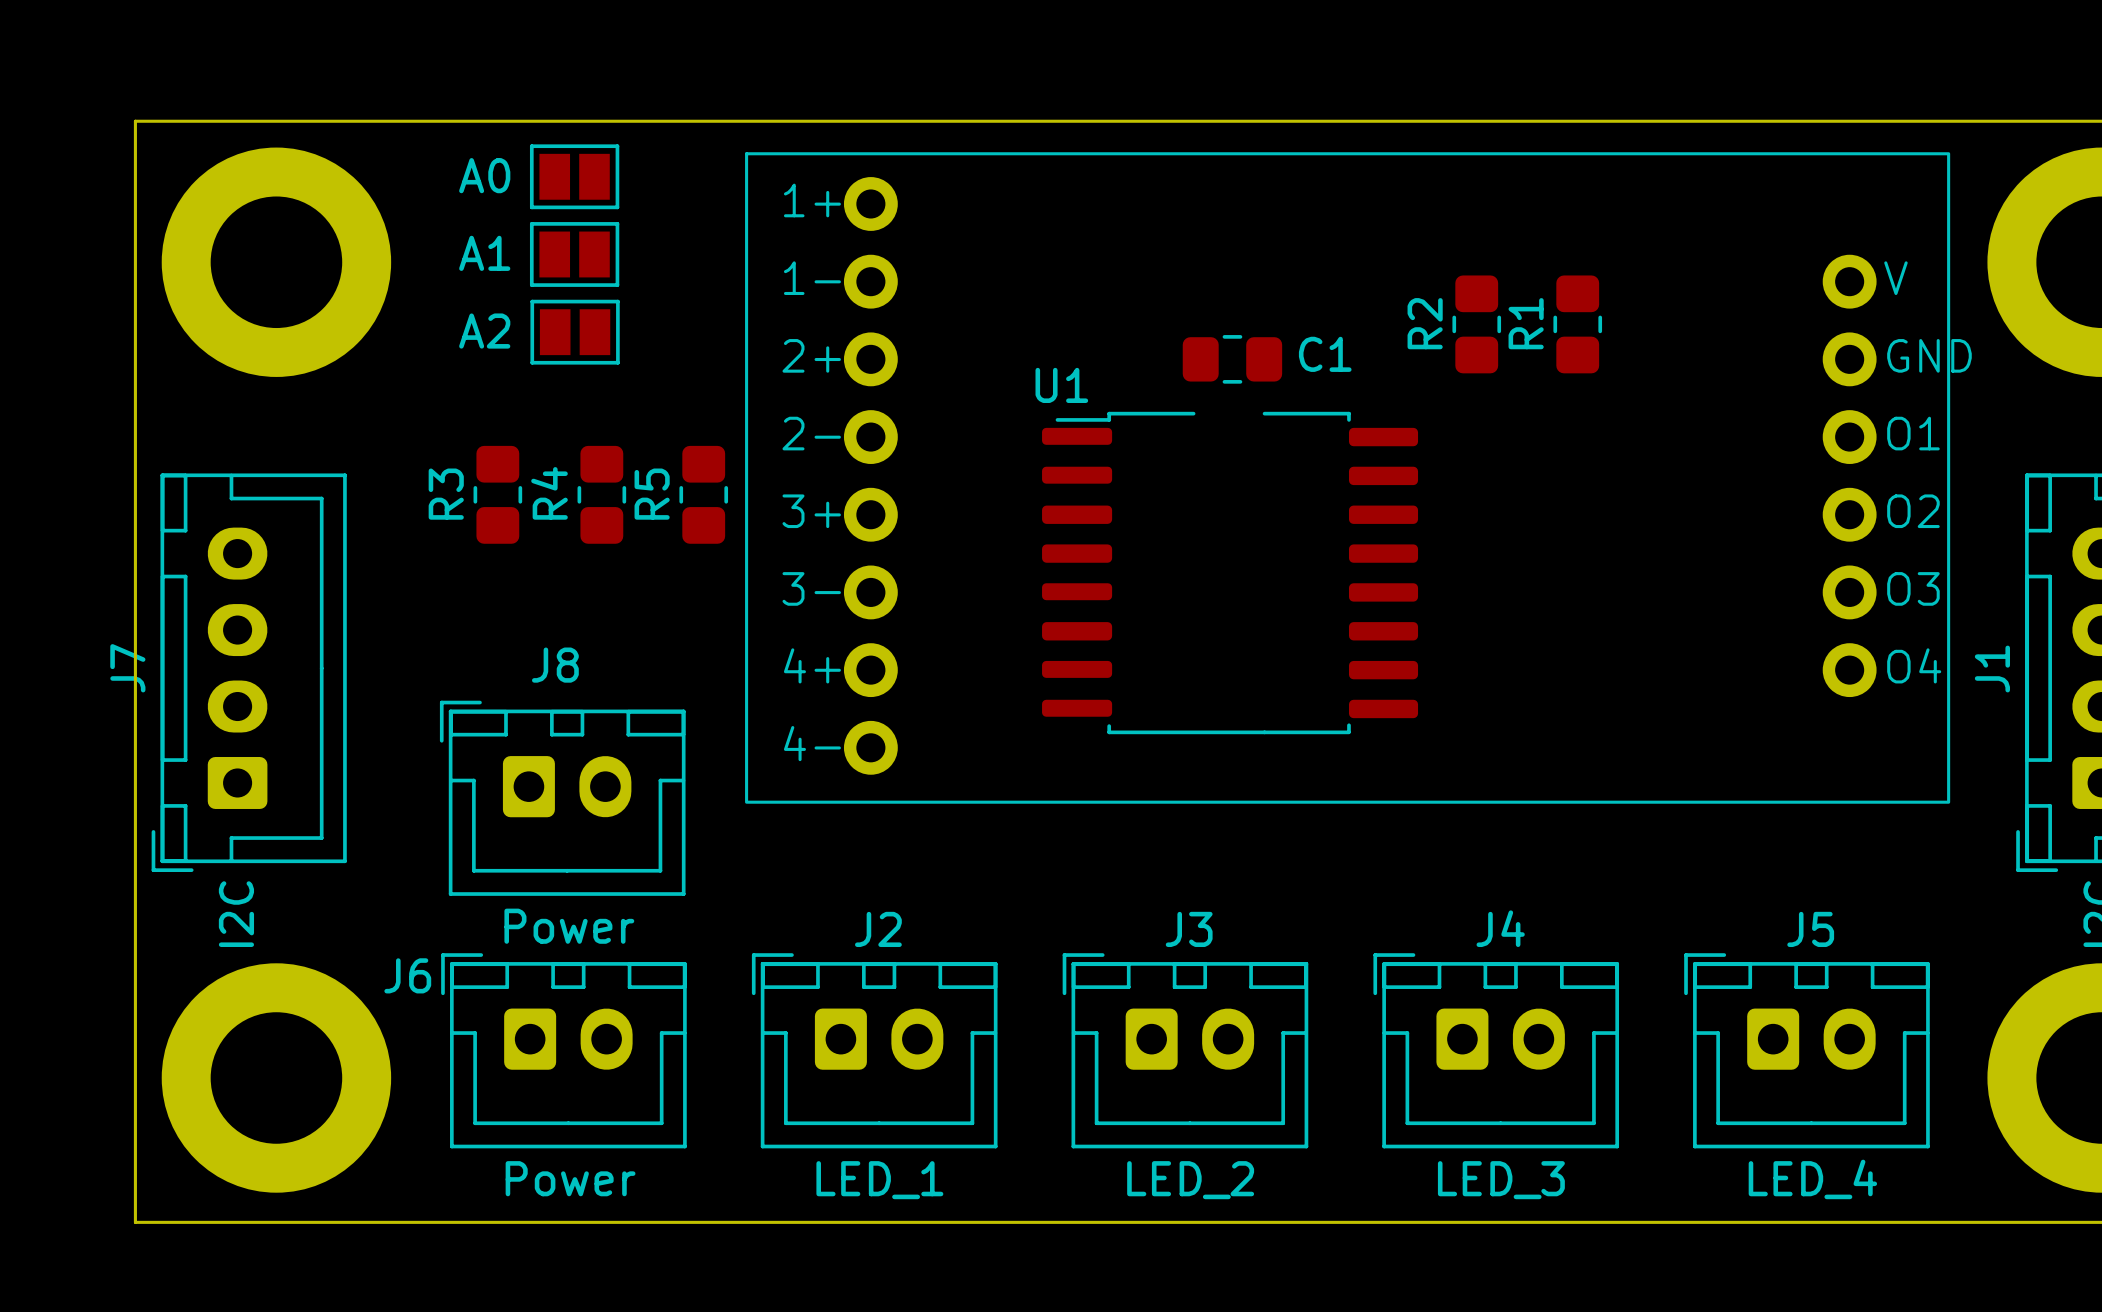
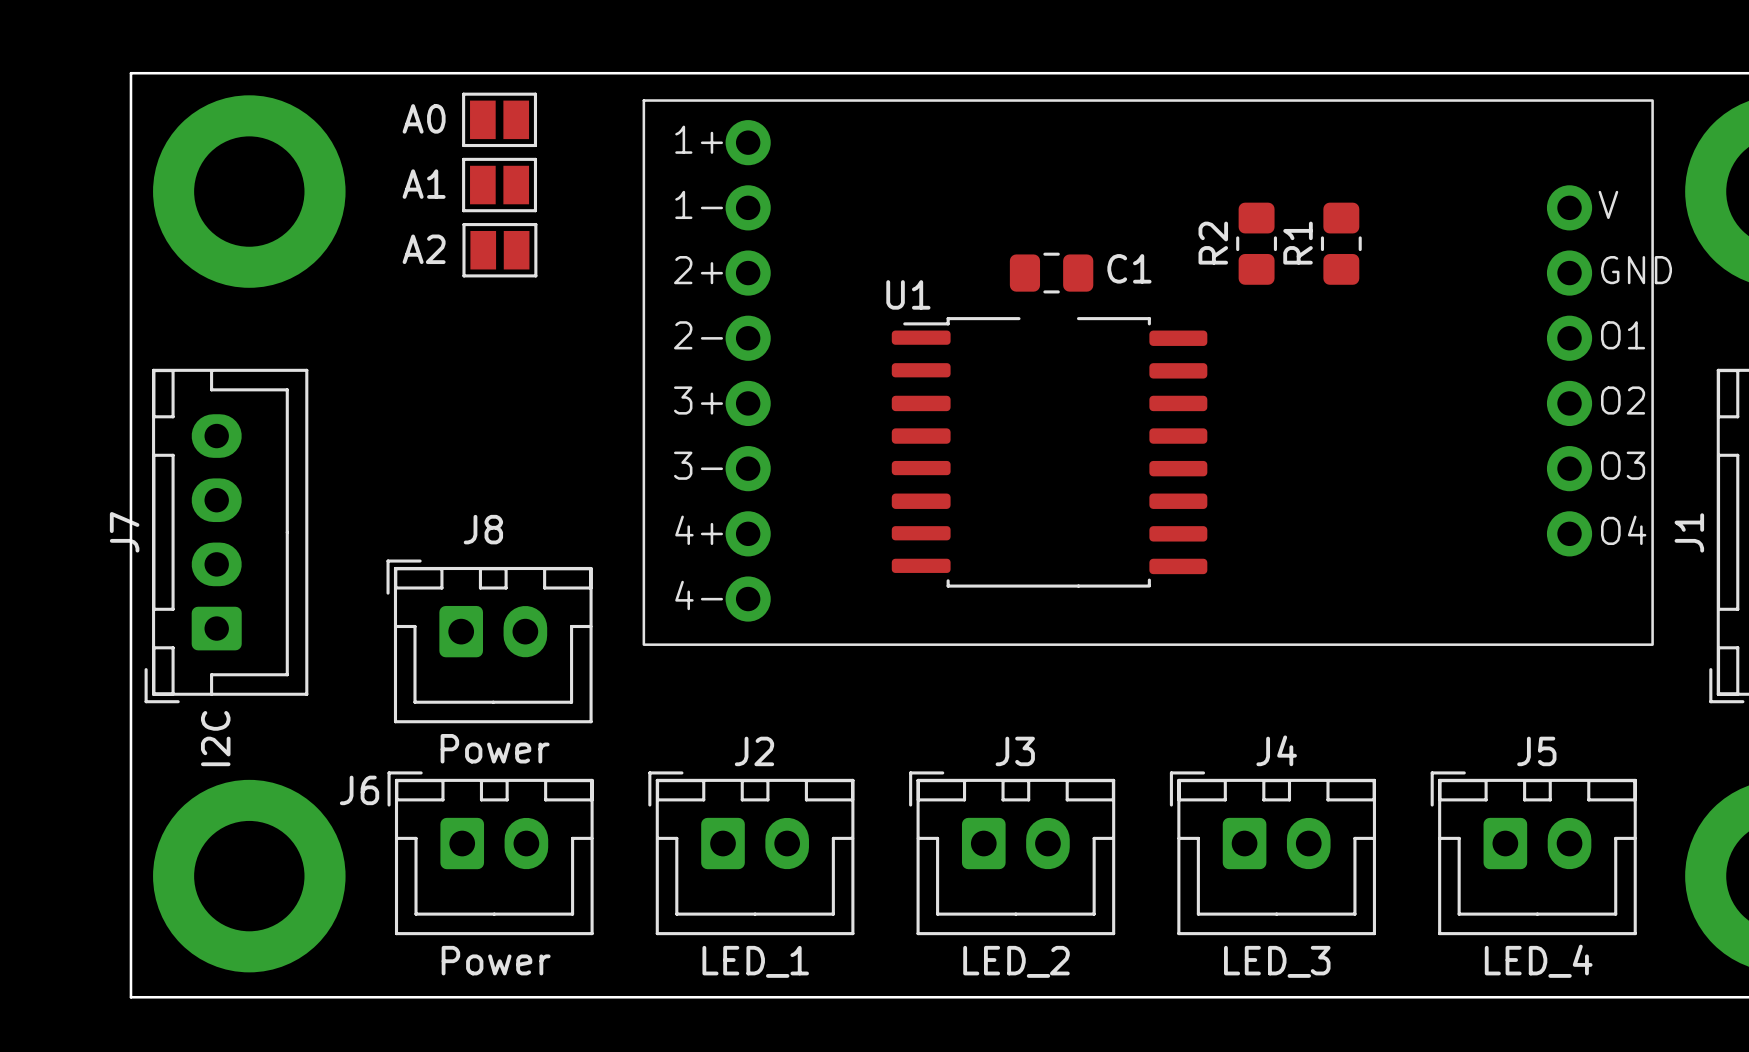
R3: (497, 494) -> none
R4: (601, 494) -> none
R5: (703, 494) -> none

